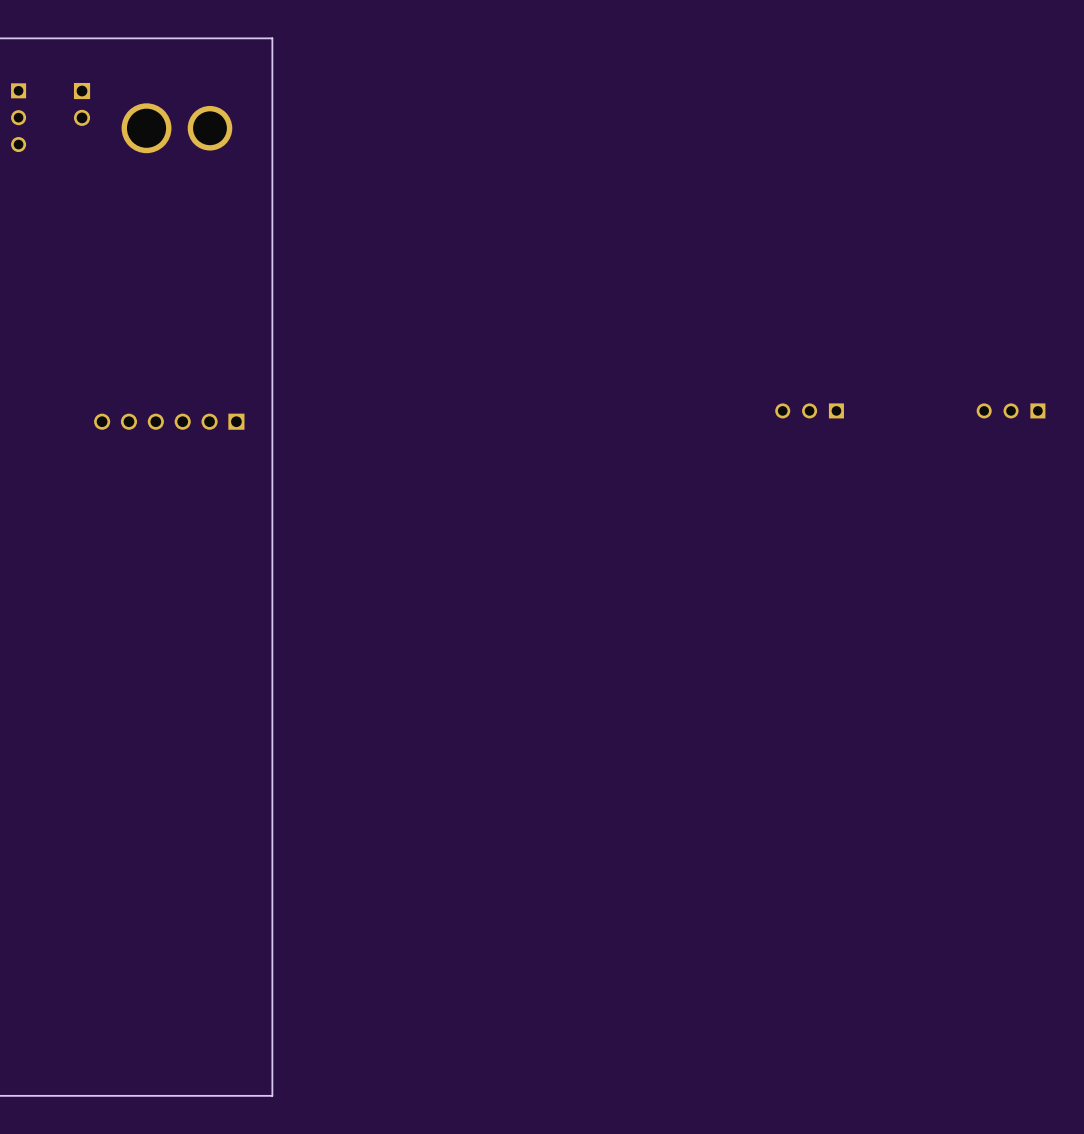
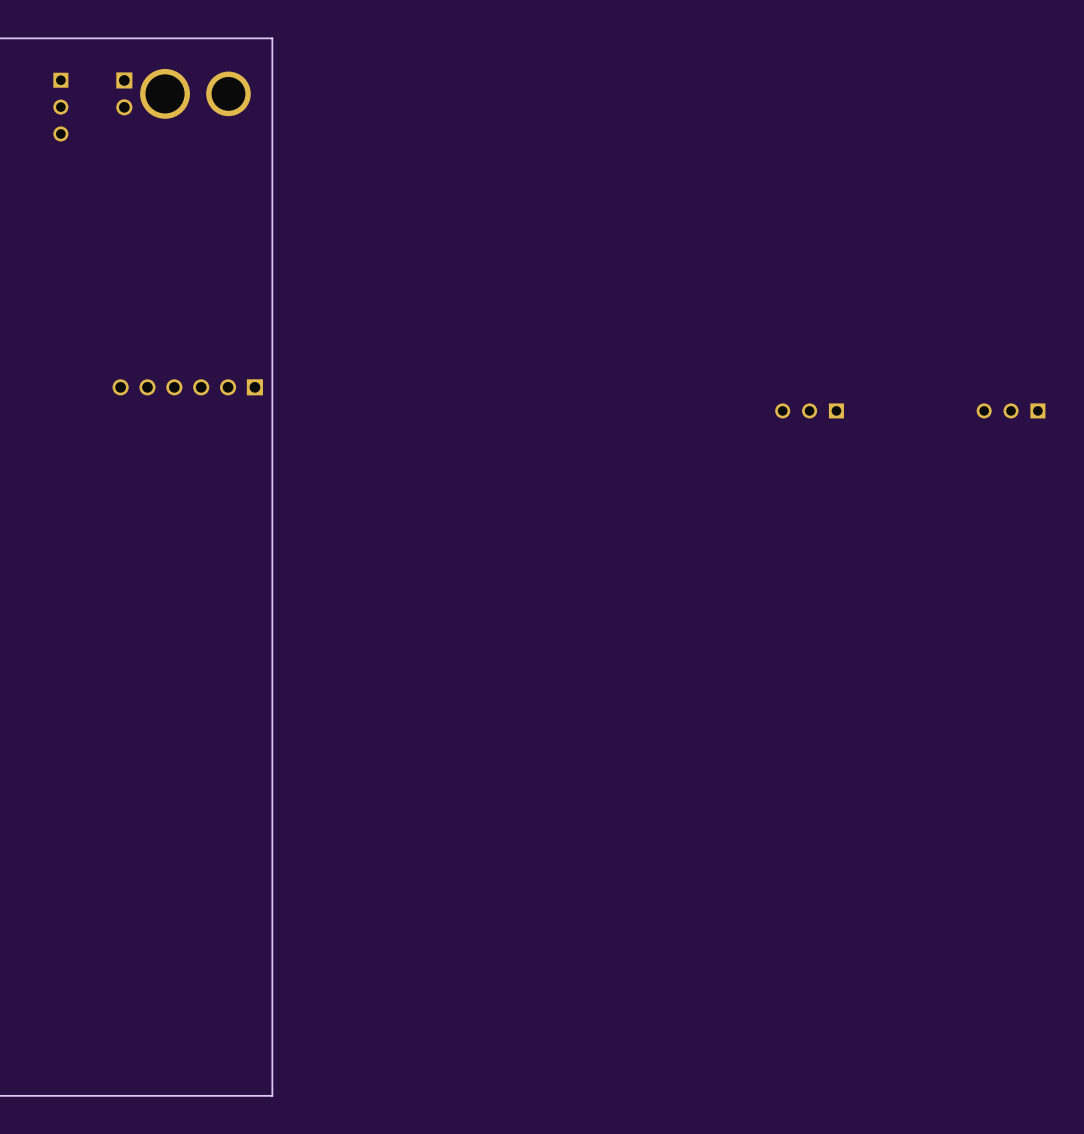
part position: (82, 104) -> (124, 93)
part position: (18, 117) -> (60, 107)
part position: (176, 128) -> (195, 93)
part position: (169, 421) -> (187, 387)

